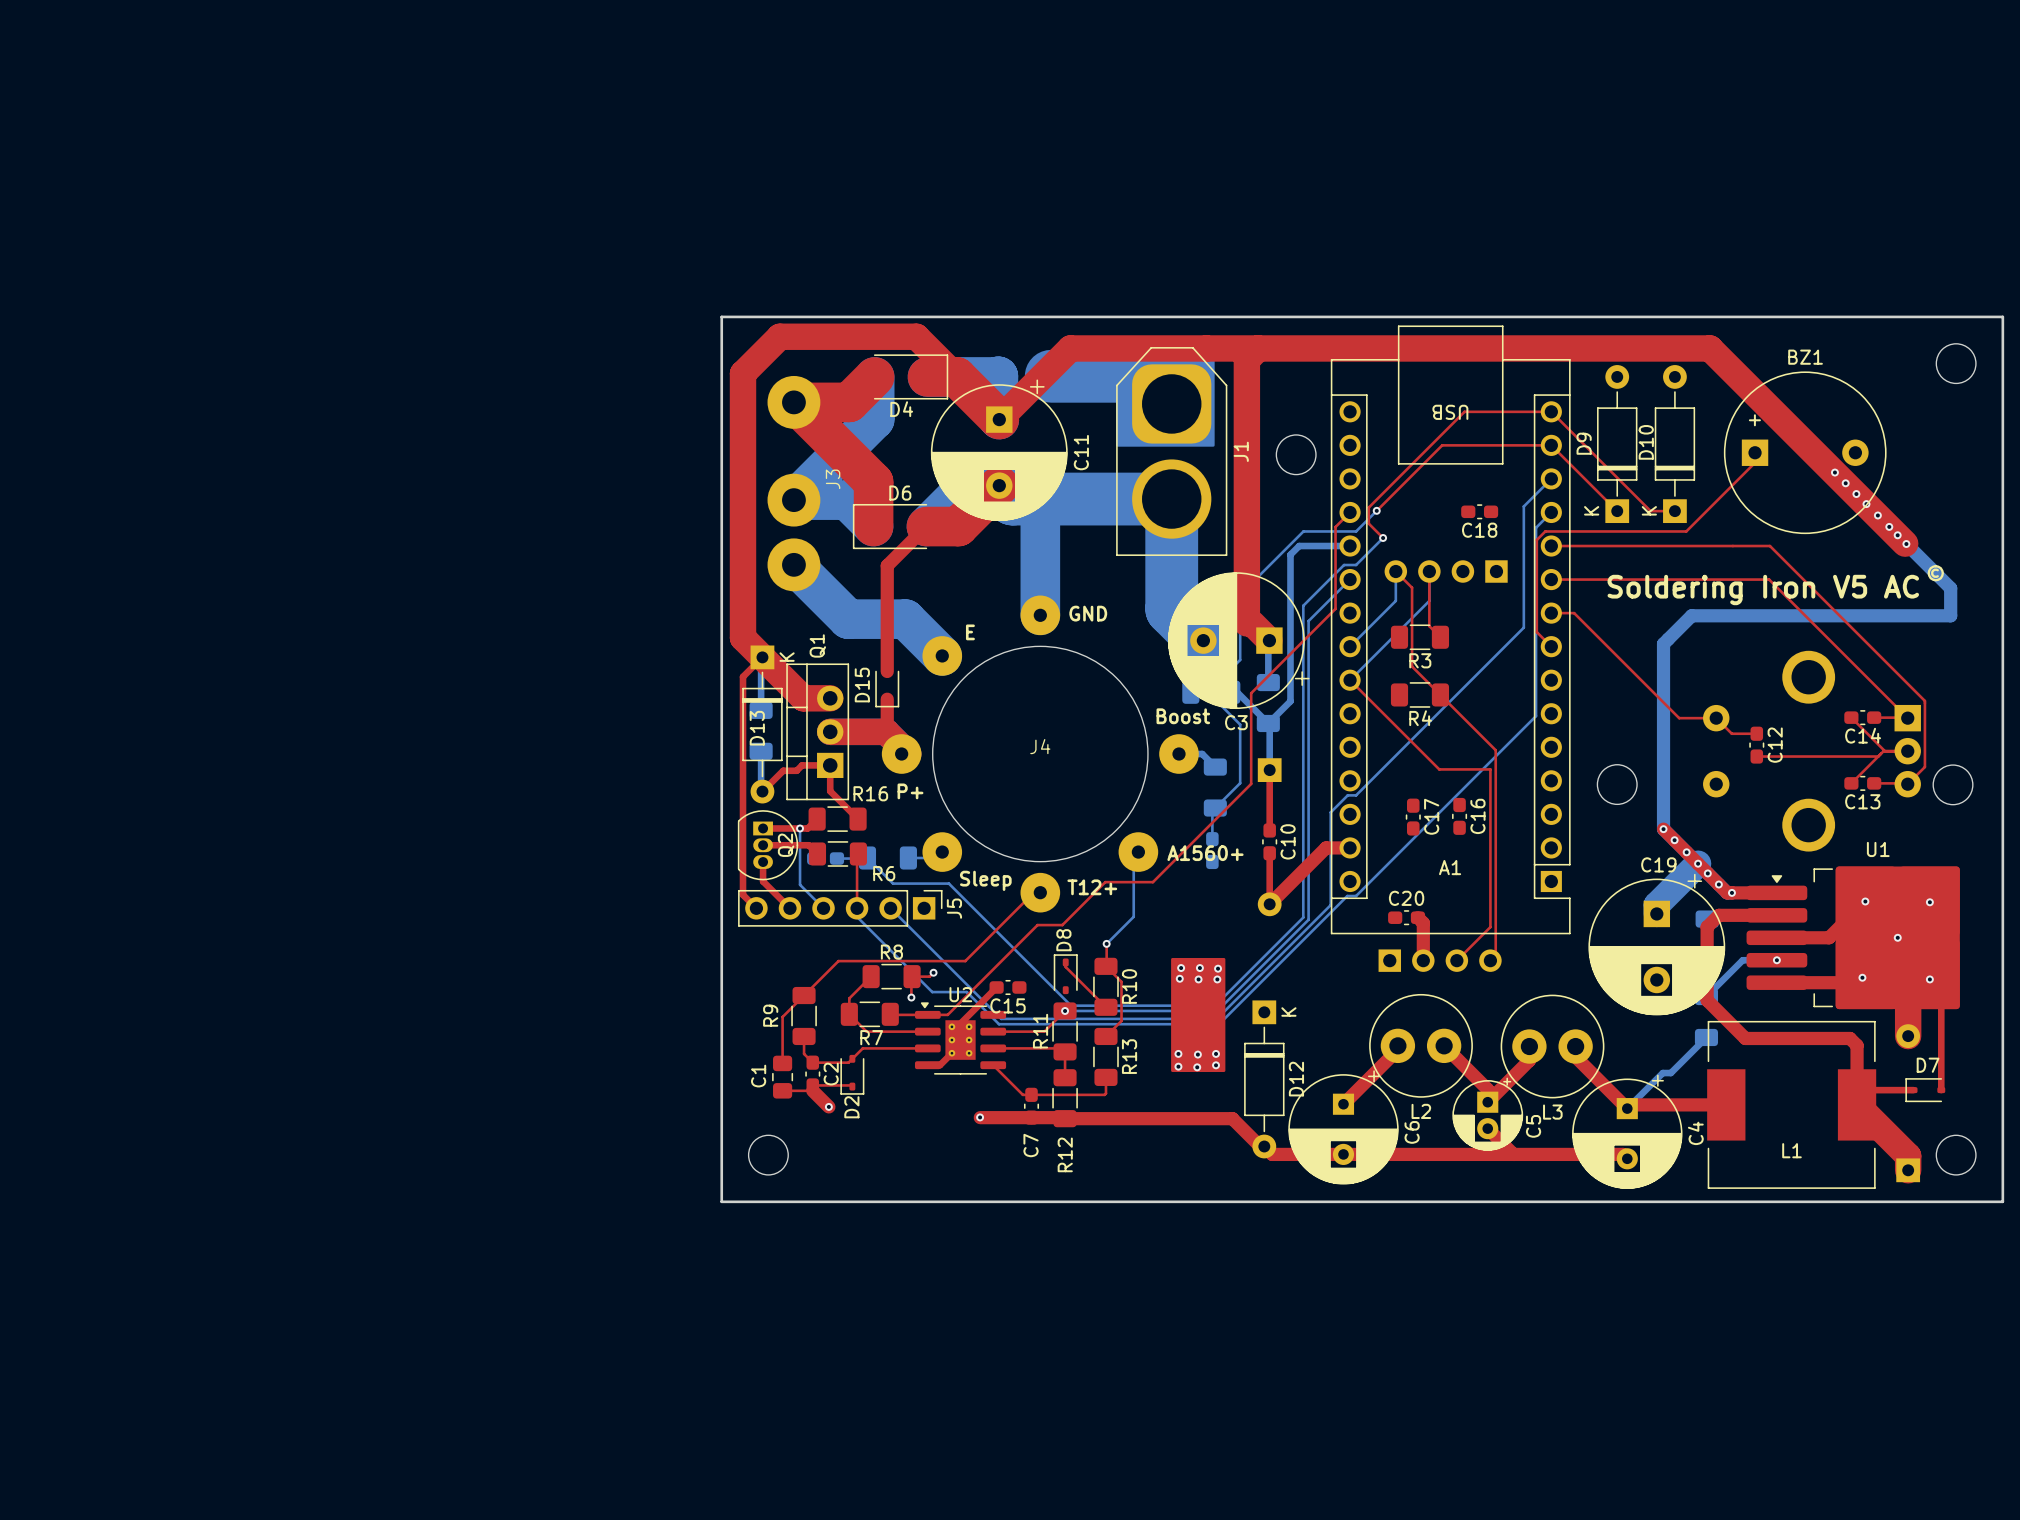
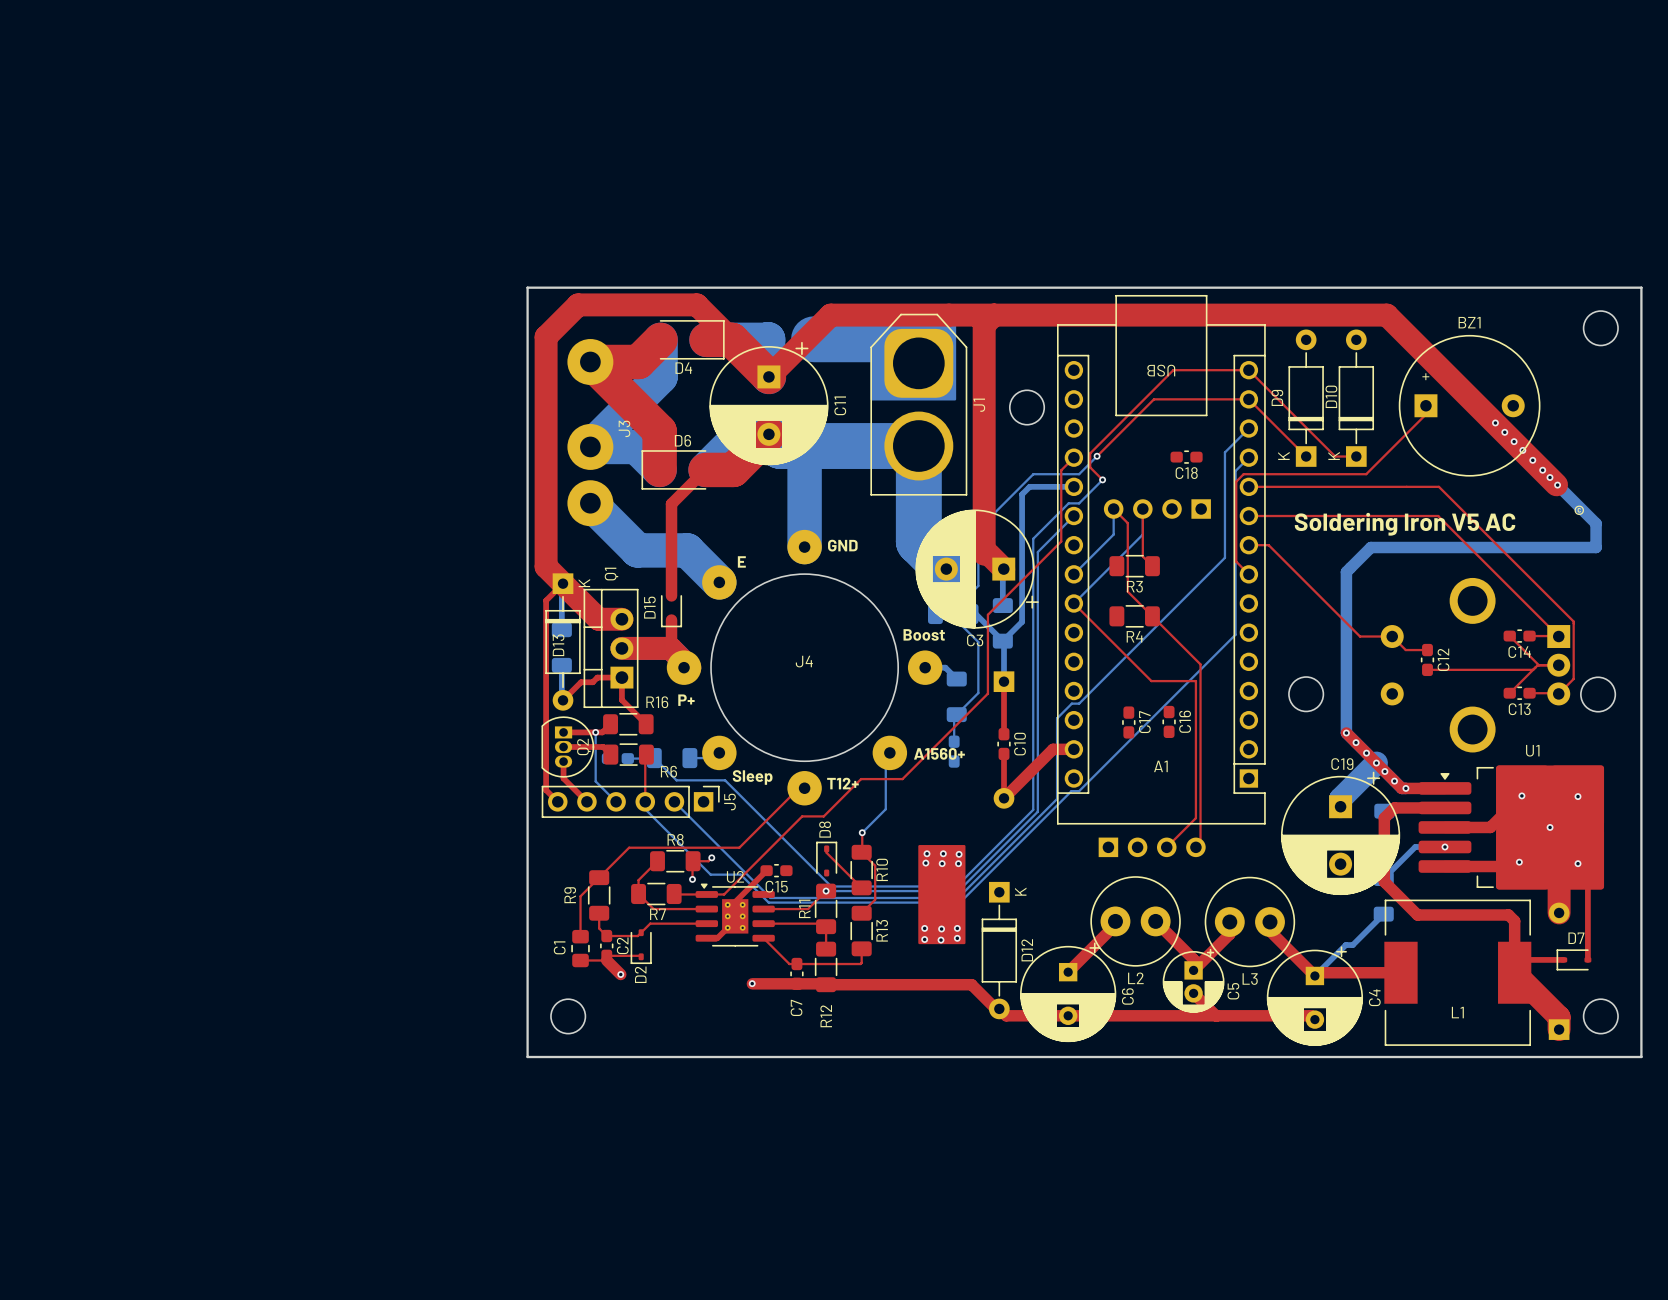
C20: (1406, 917) -> none
top track: (1417, 917) (1423, 923) (1423, 960) -> none

